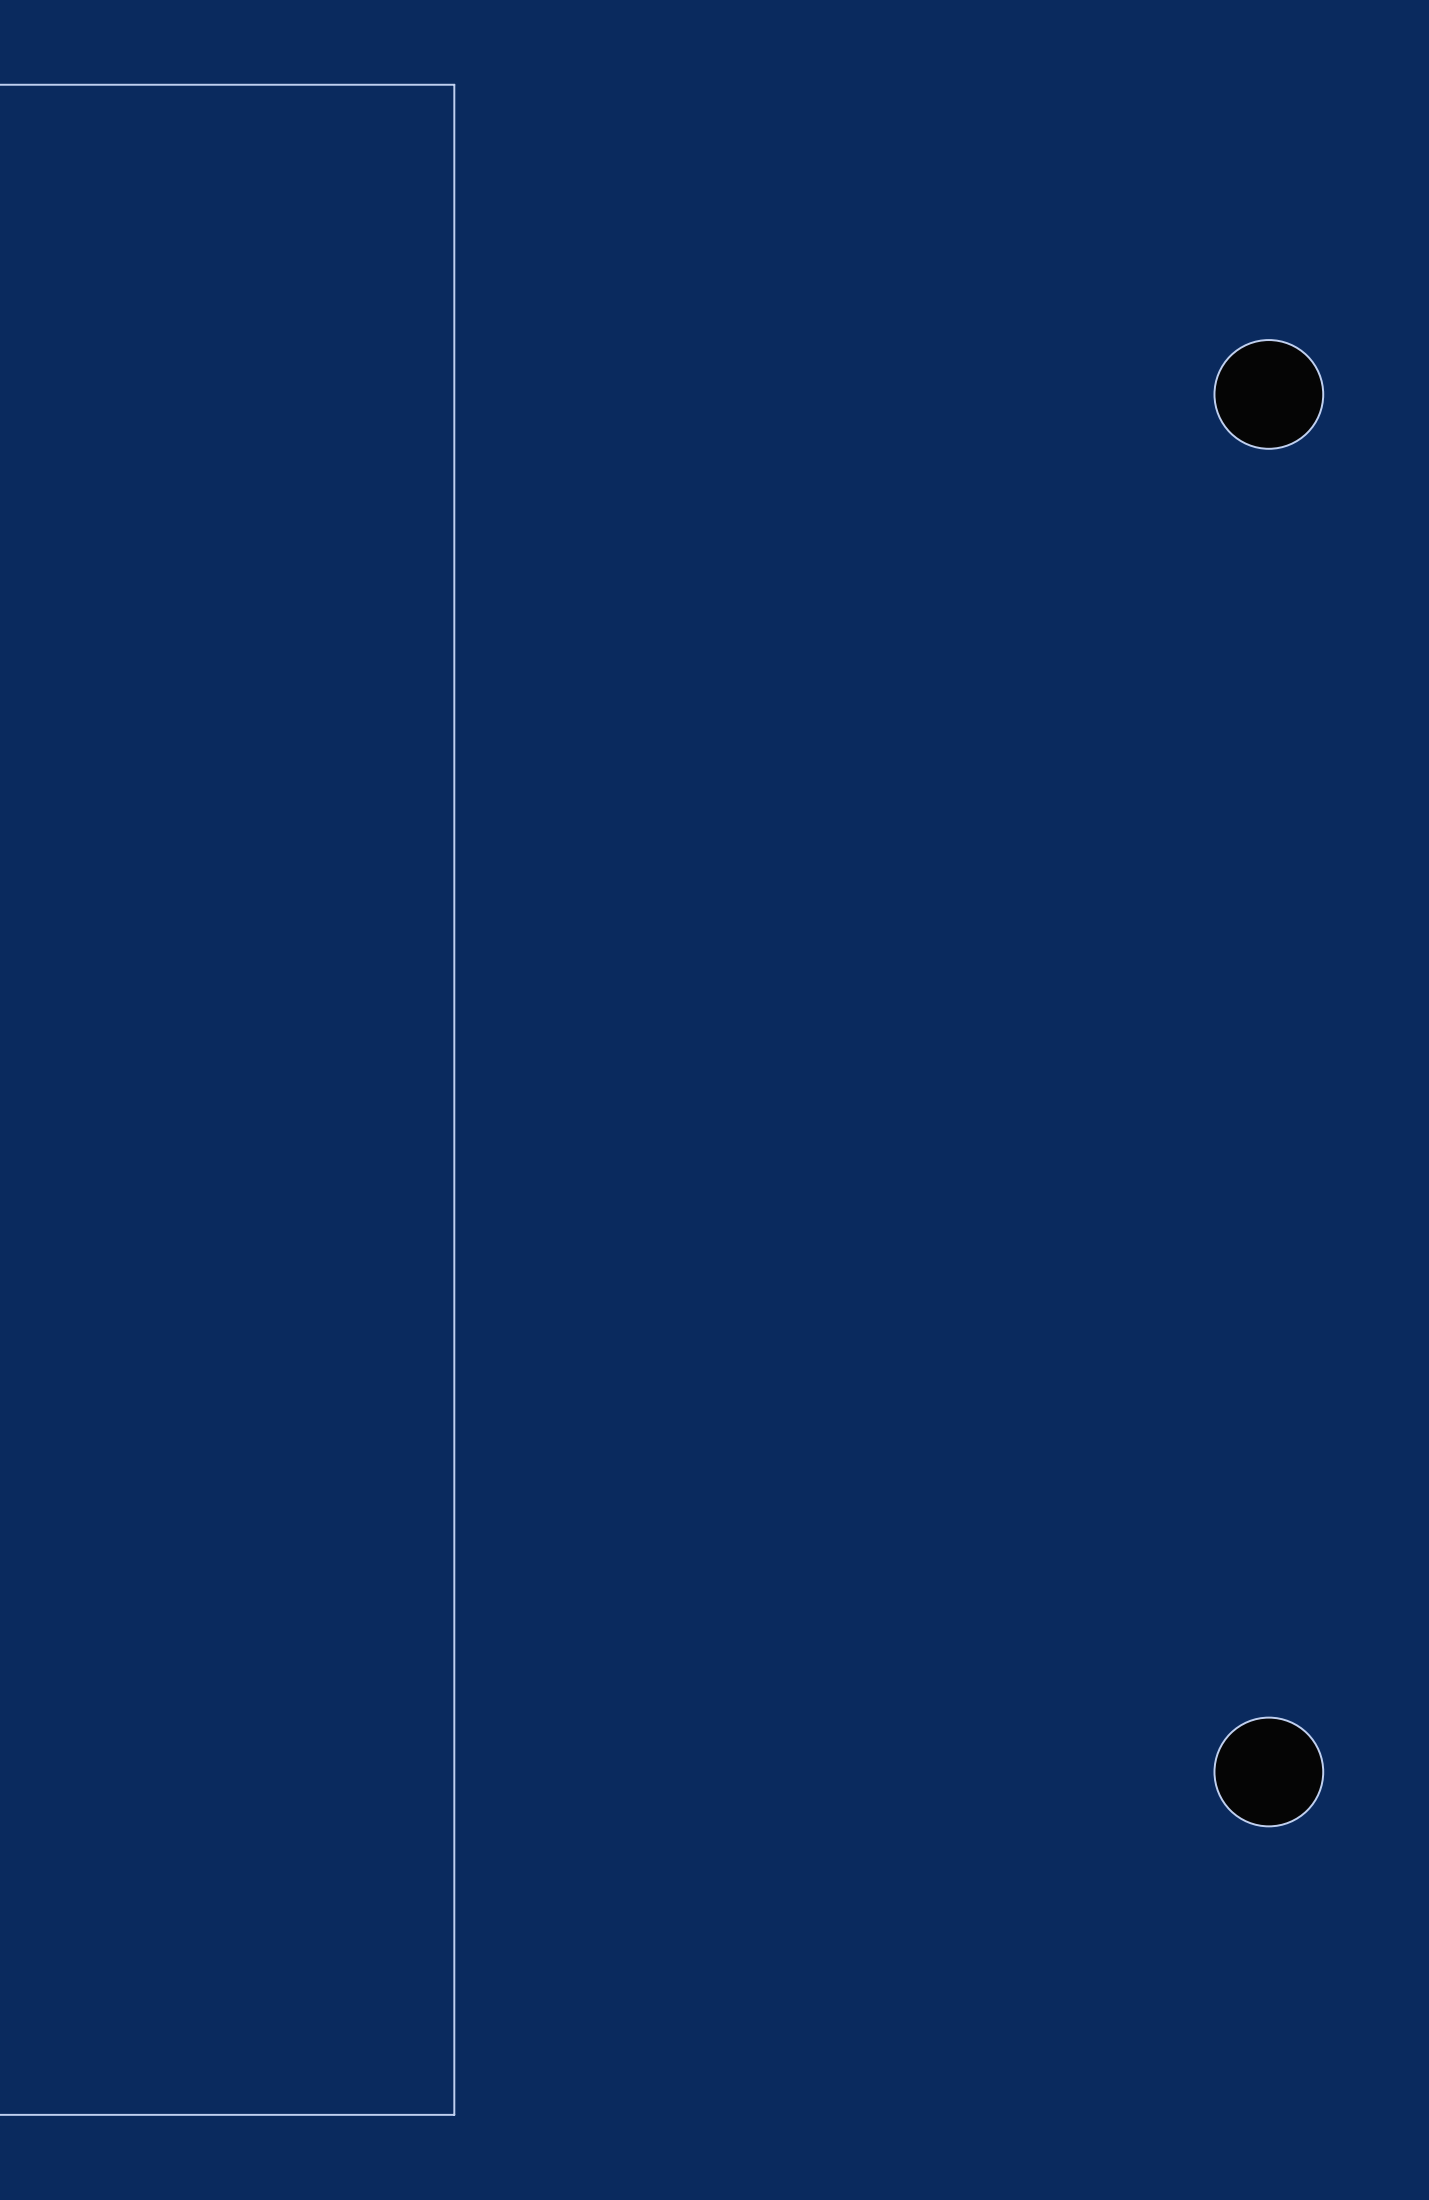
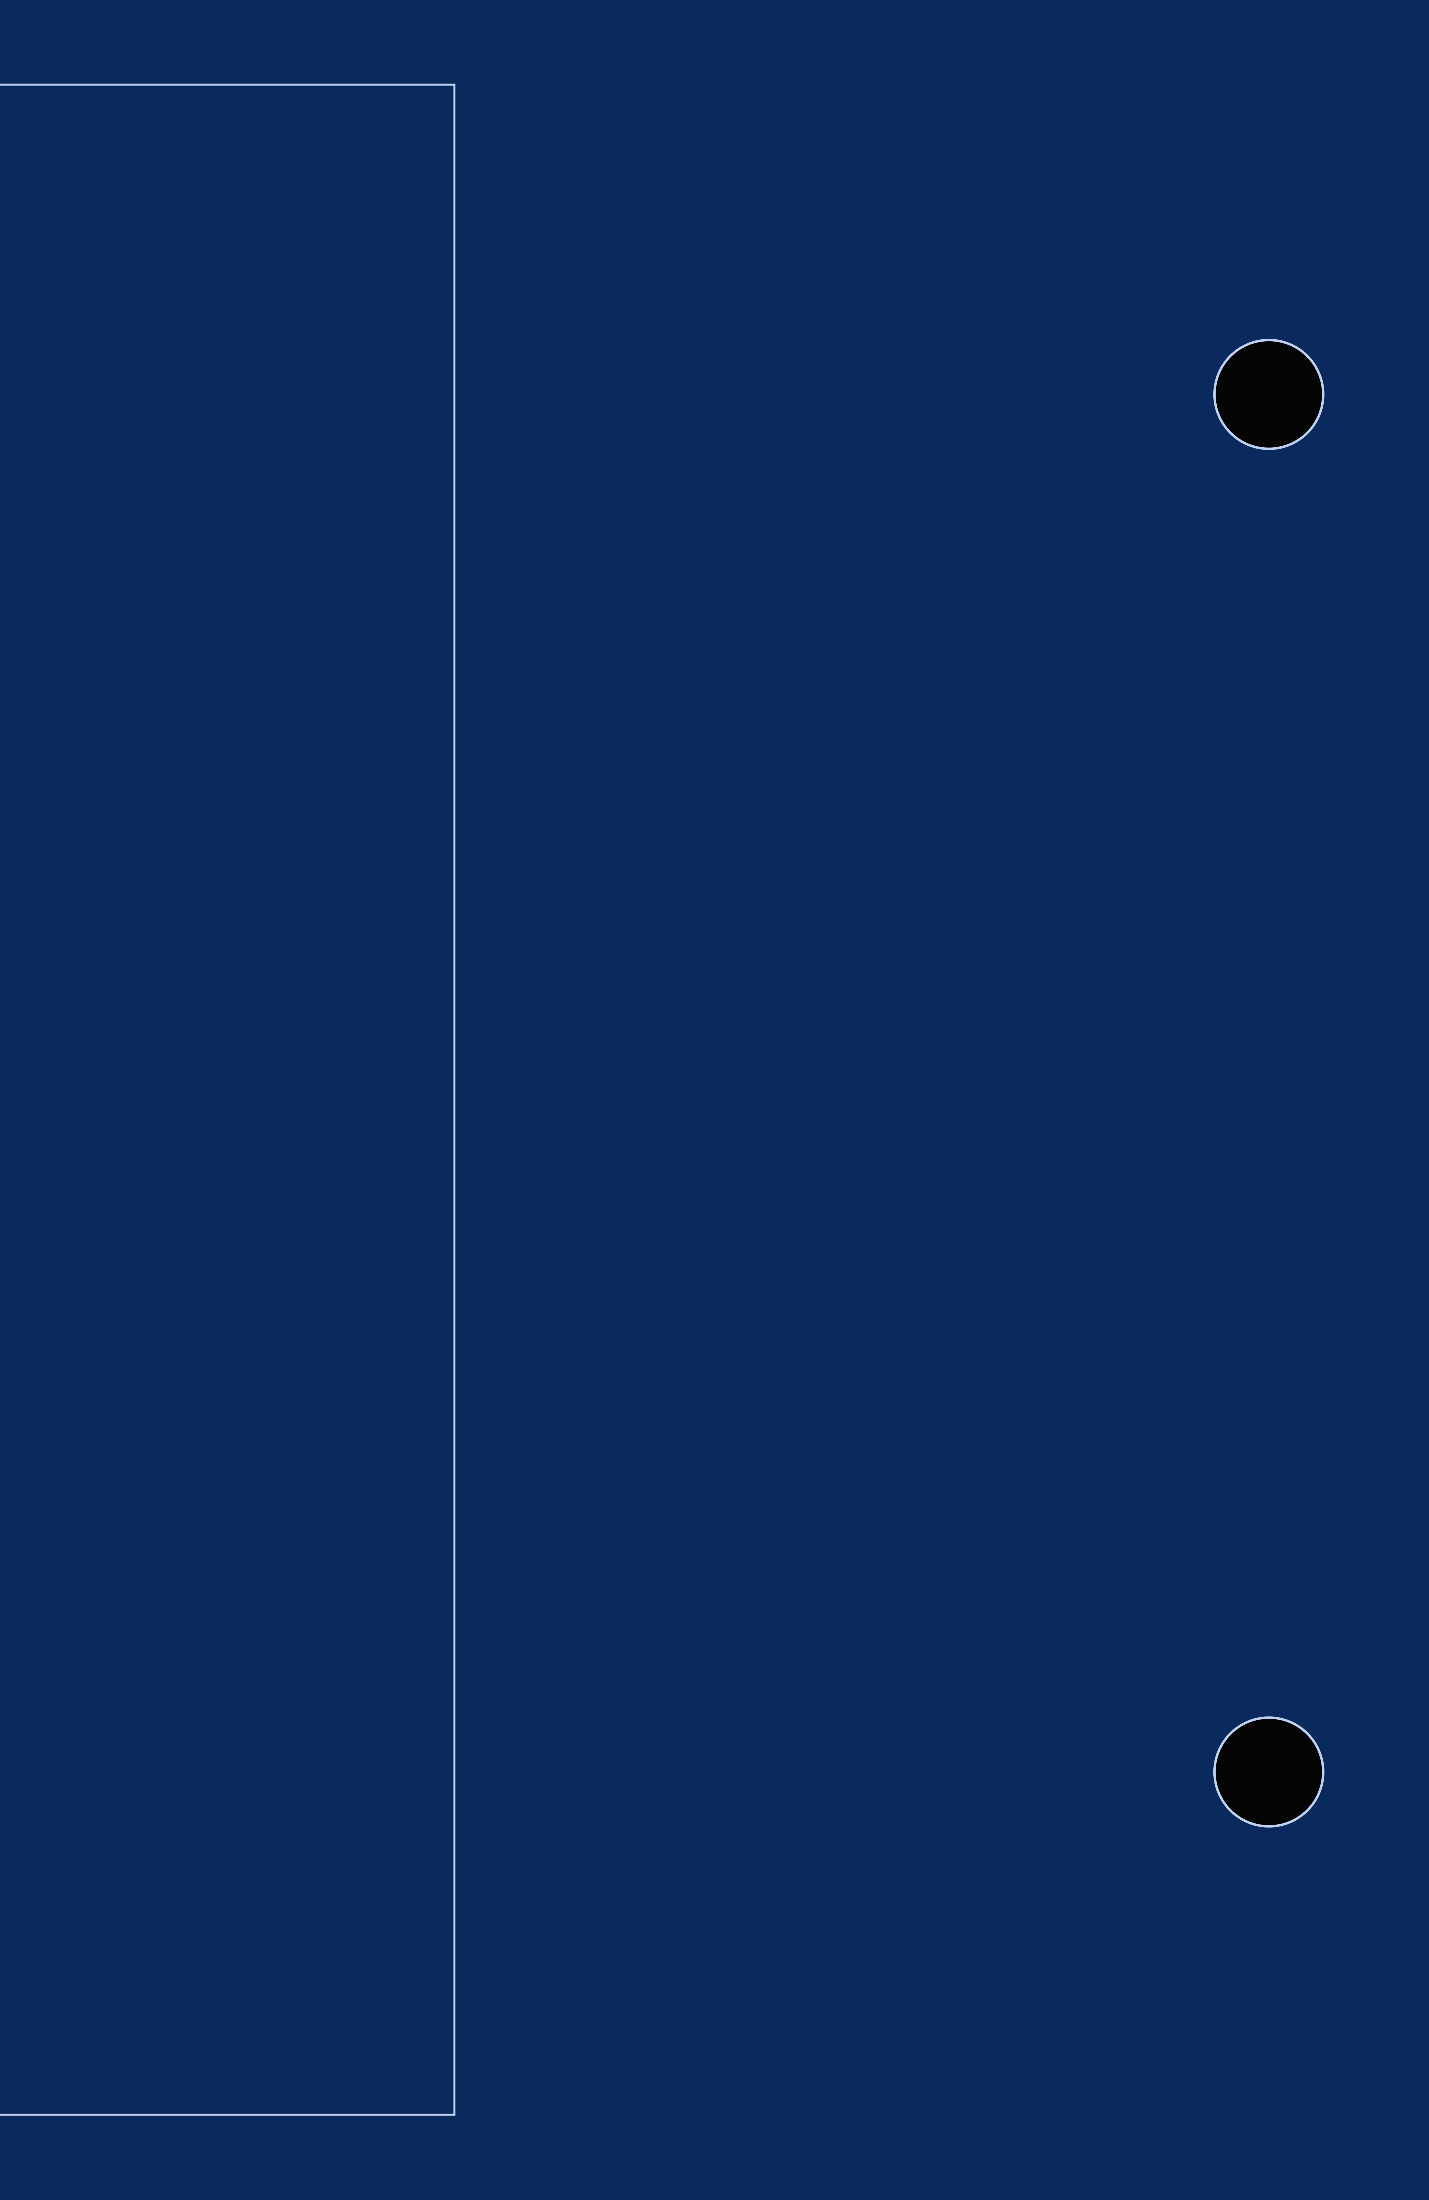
hole: none -> (1268, 394)
hole: none -> (1268, 1771)

